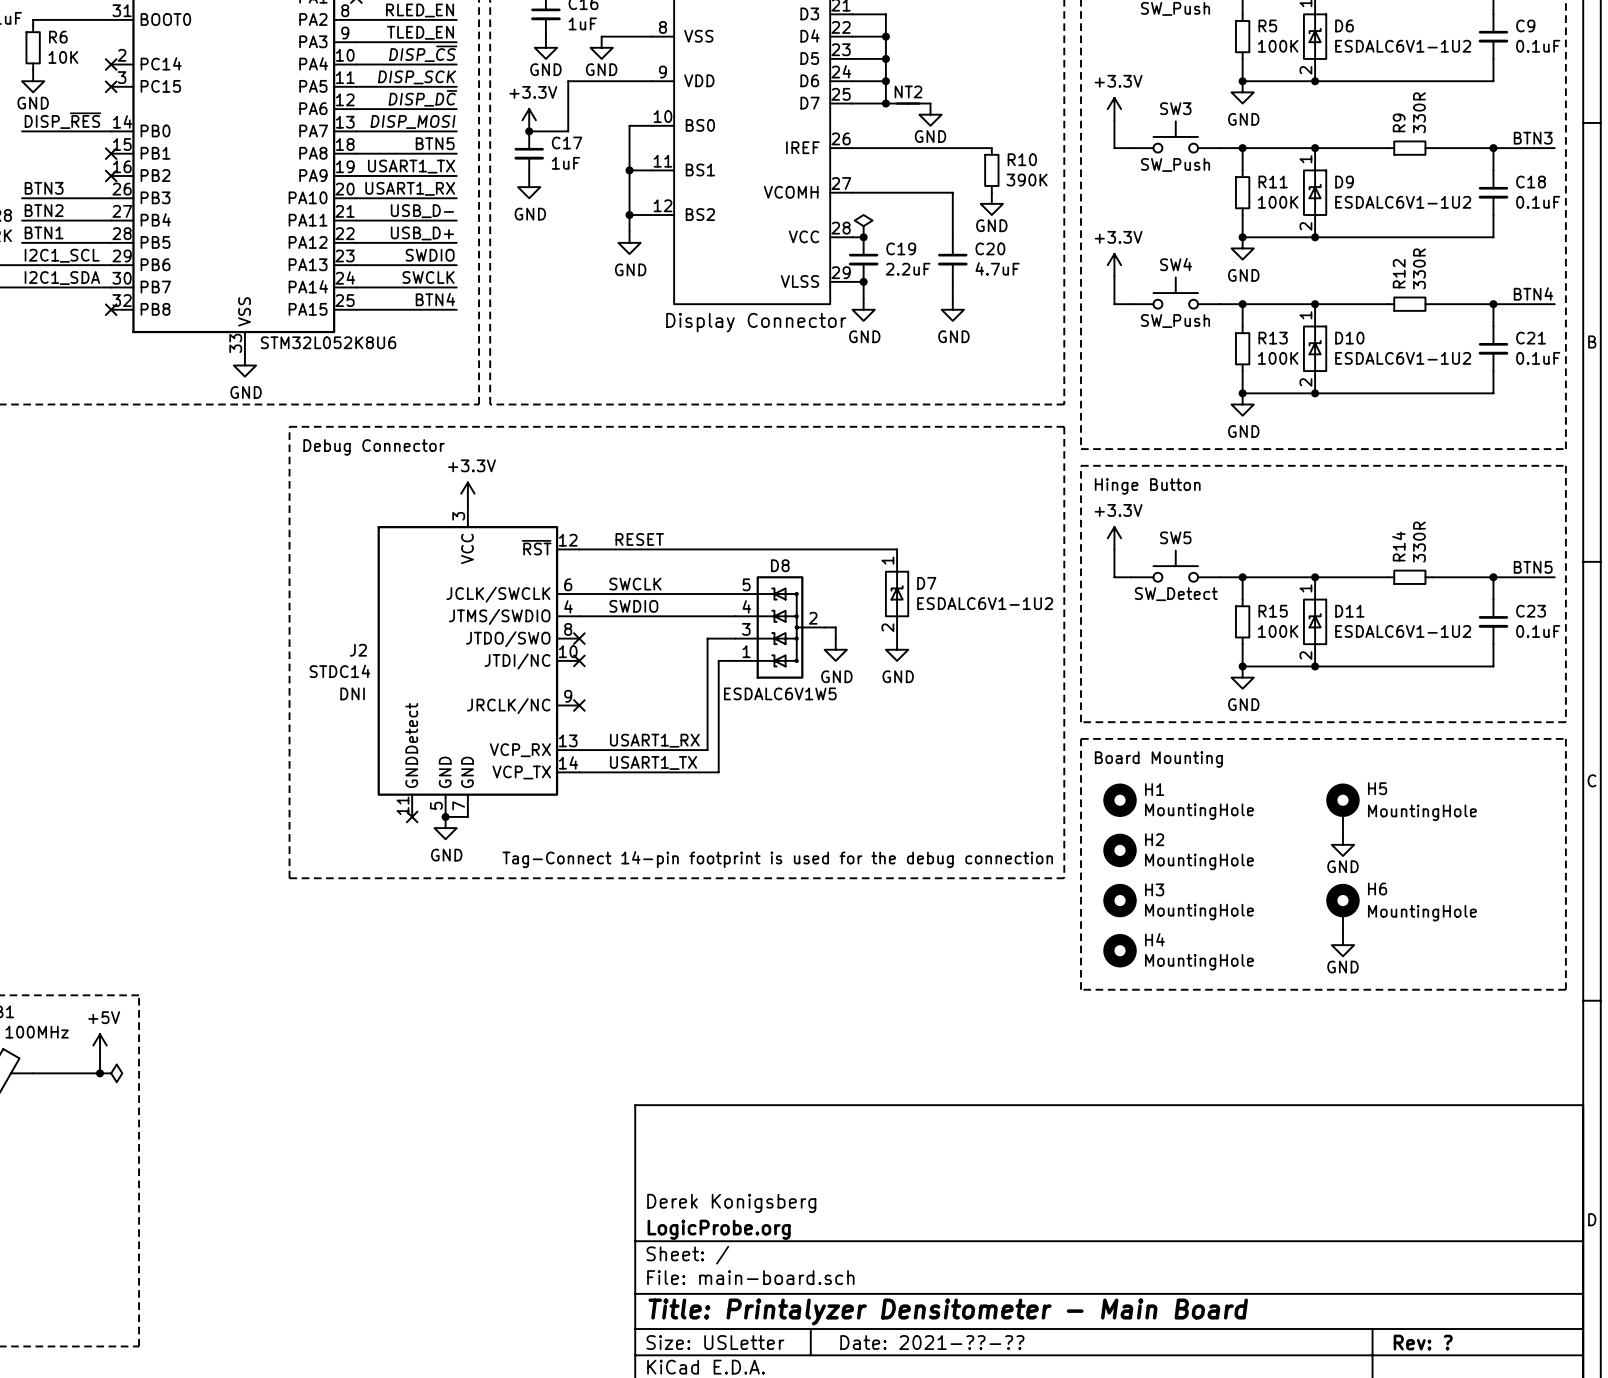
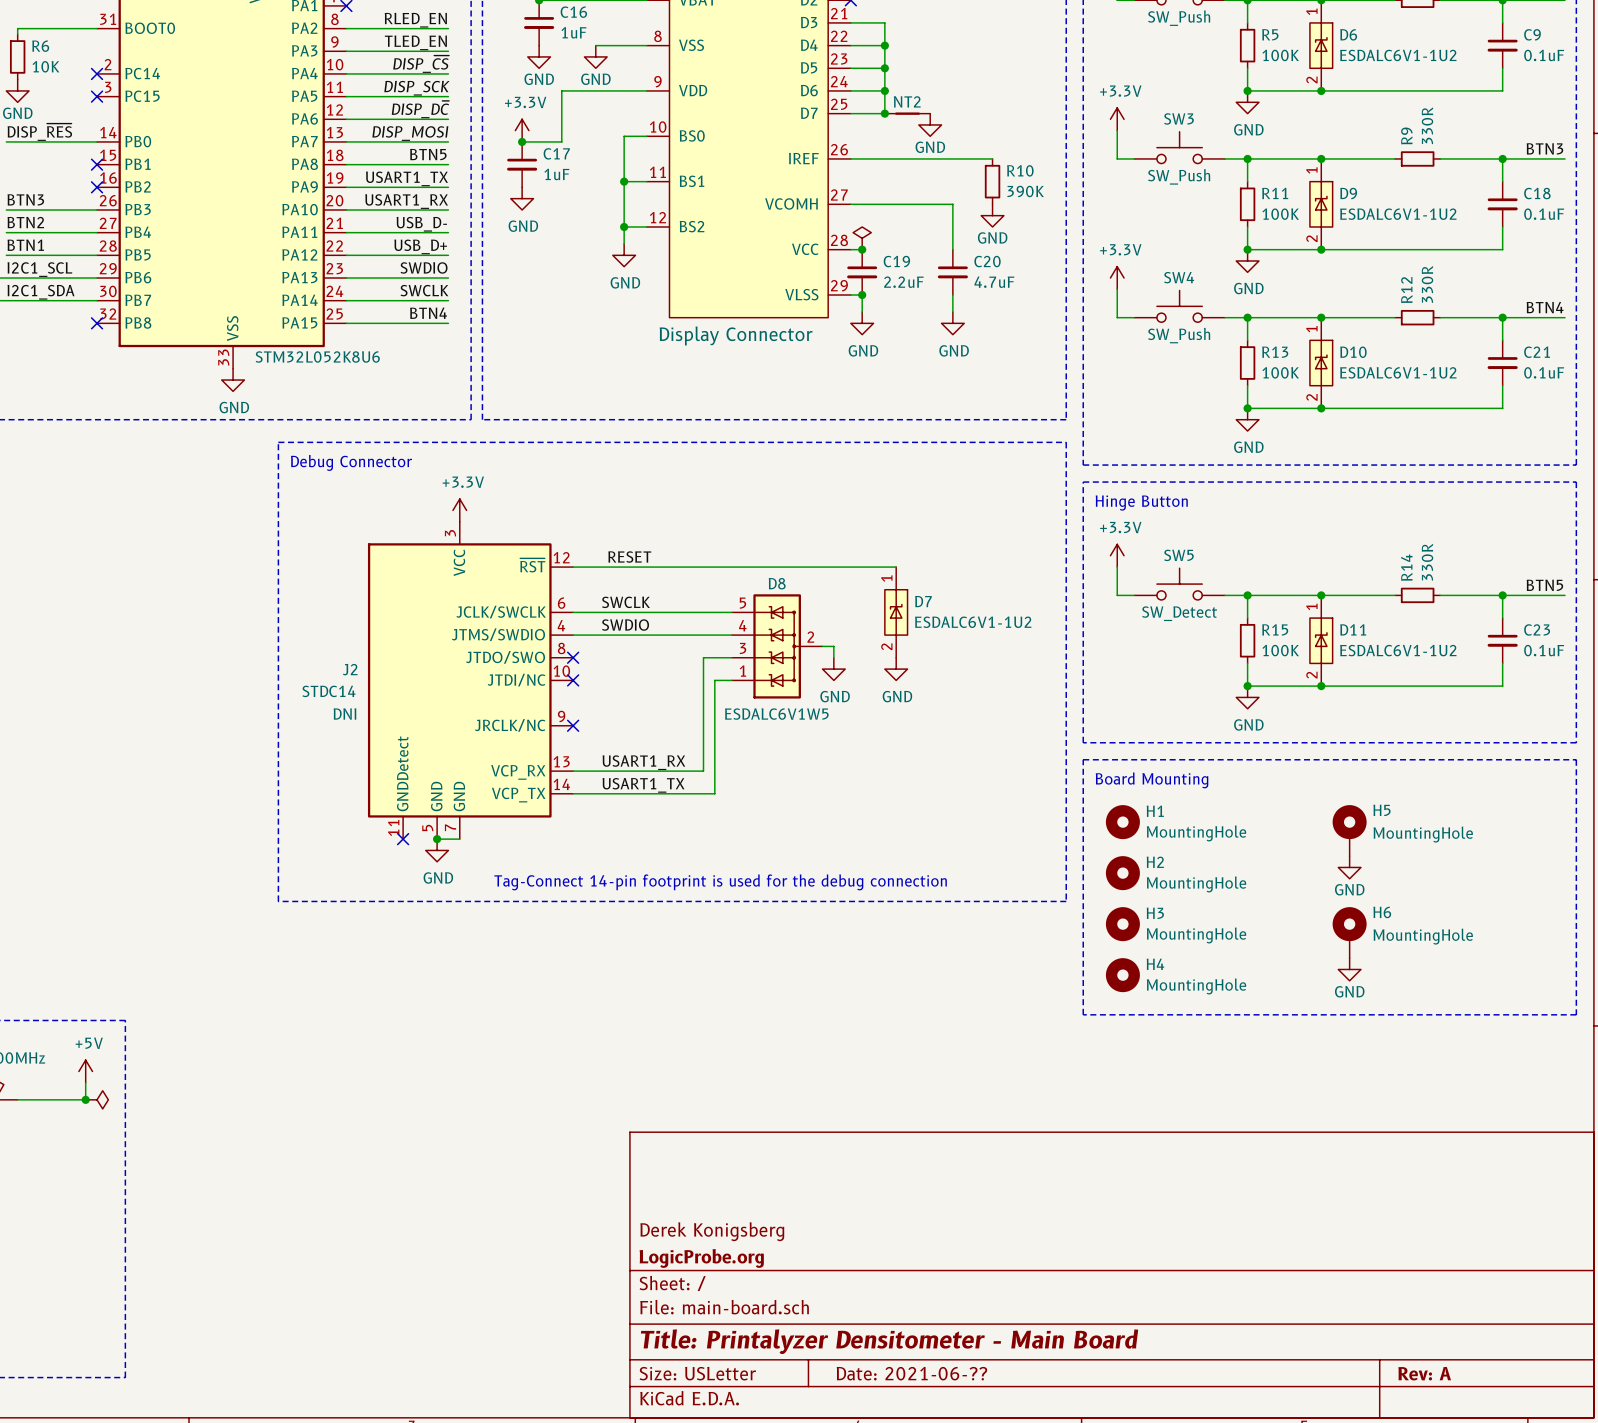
title block: Date: 2021-??-?? (932, 1342) -> Date: 2021-06-?? (911, 1373)
title block: Rev: ? (1423, 1342) -> Rev: A (1424, 1373)

